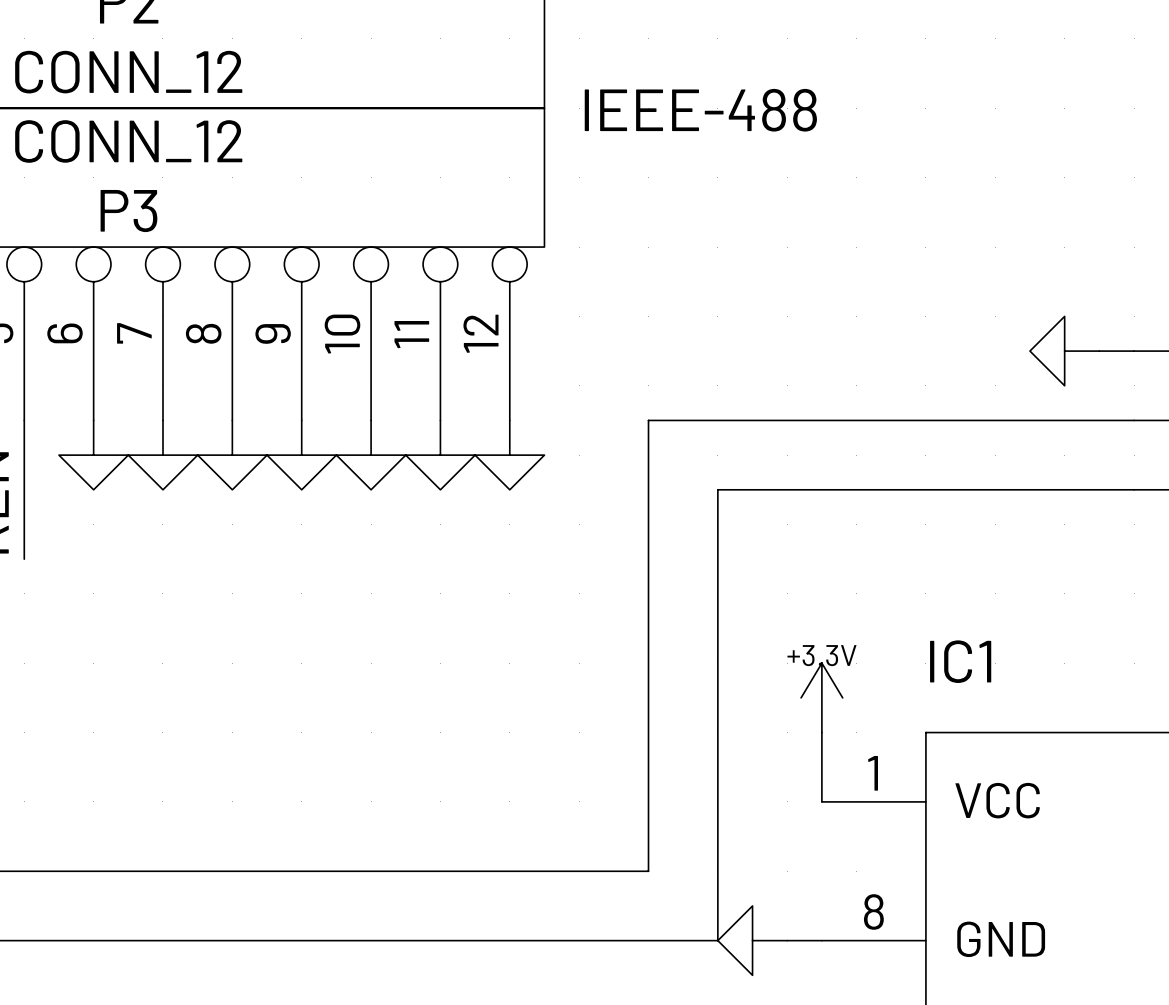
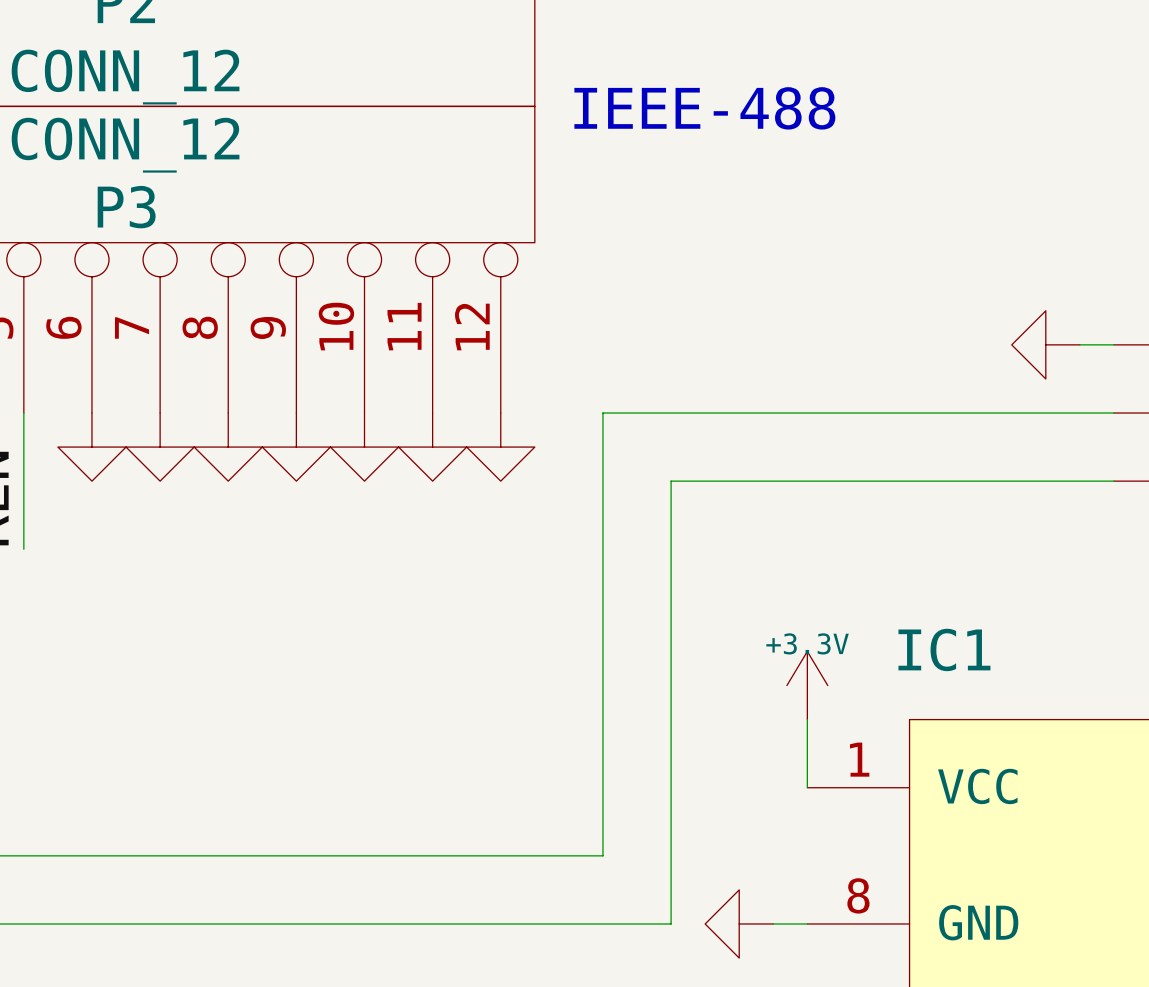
wire: (648, 420) (648, 871) (613, 871) -> (637, 413) (602, 413) (602, 855)
wire: (717, 489) (717, 940) (683, 940) -> (705, 481) (671, 481) (671, 923)

